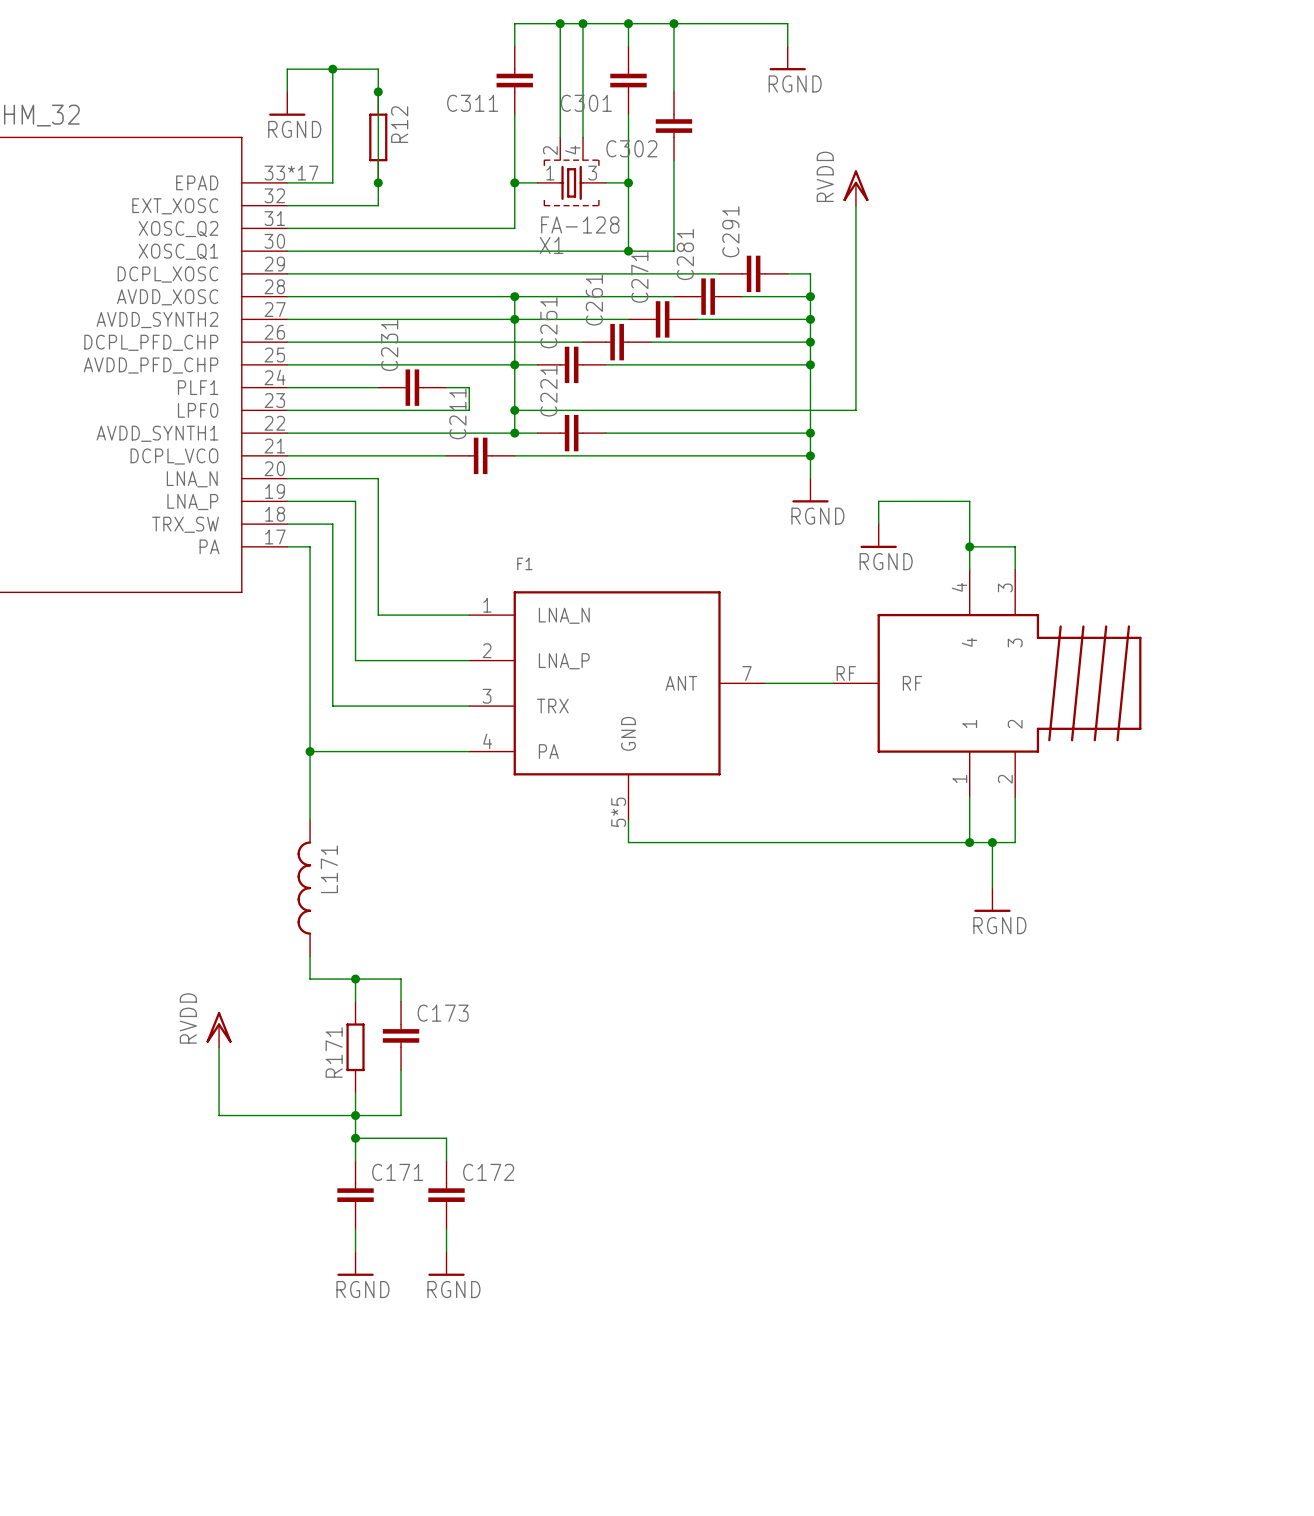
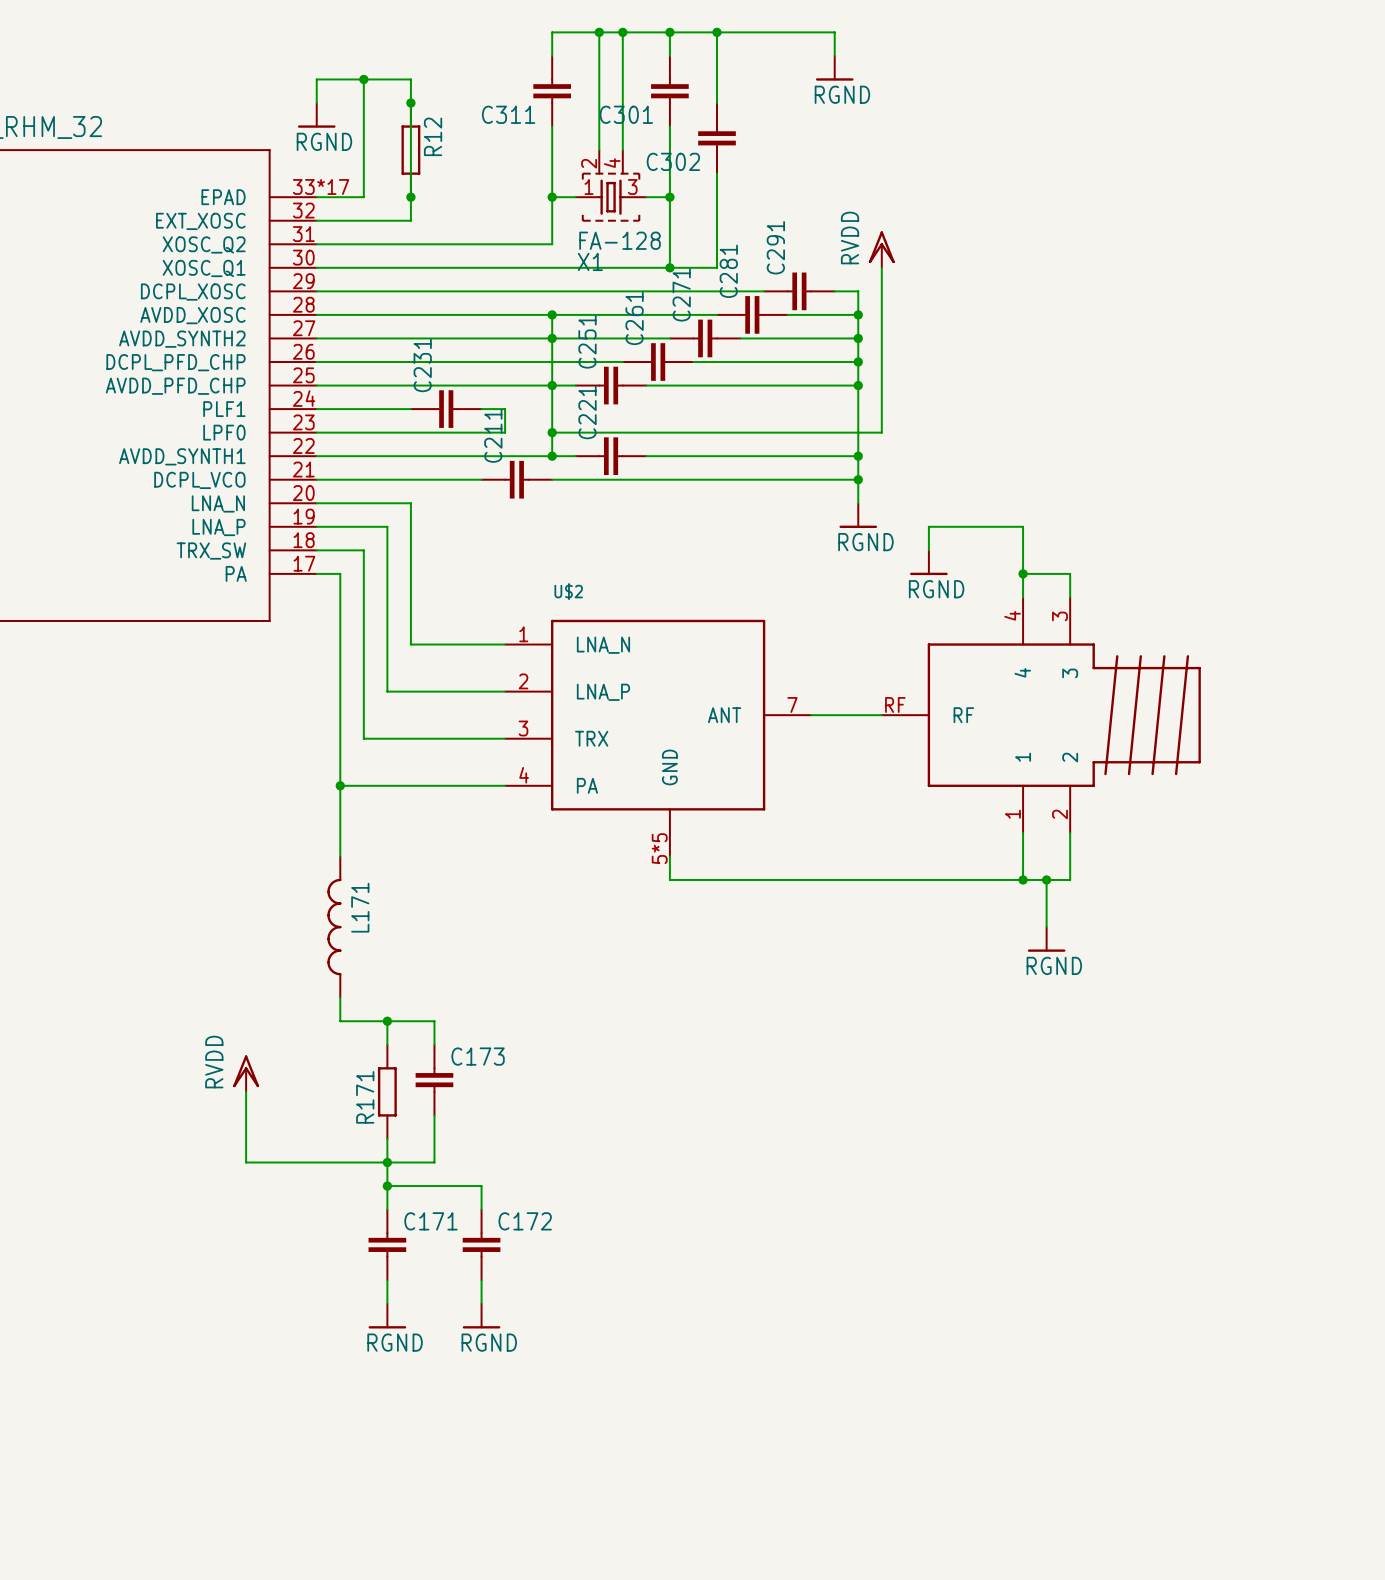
power symbol position: RVDD (855, 188) -> RVDD (881, 249)
wire: (855, 205) (855, 410) (833, 410) -> (881, 267) (881, 432)
F1 name: F1 (524, 563) -> U$2 (568, 591)

